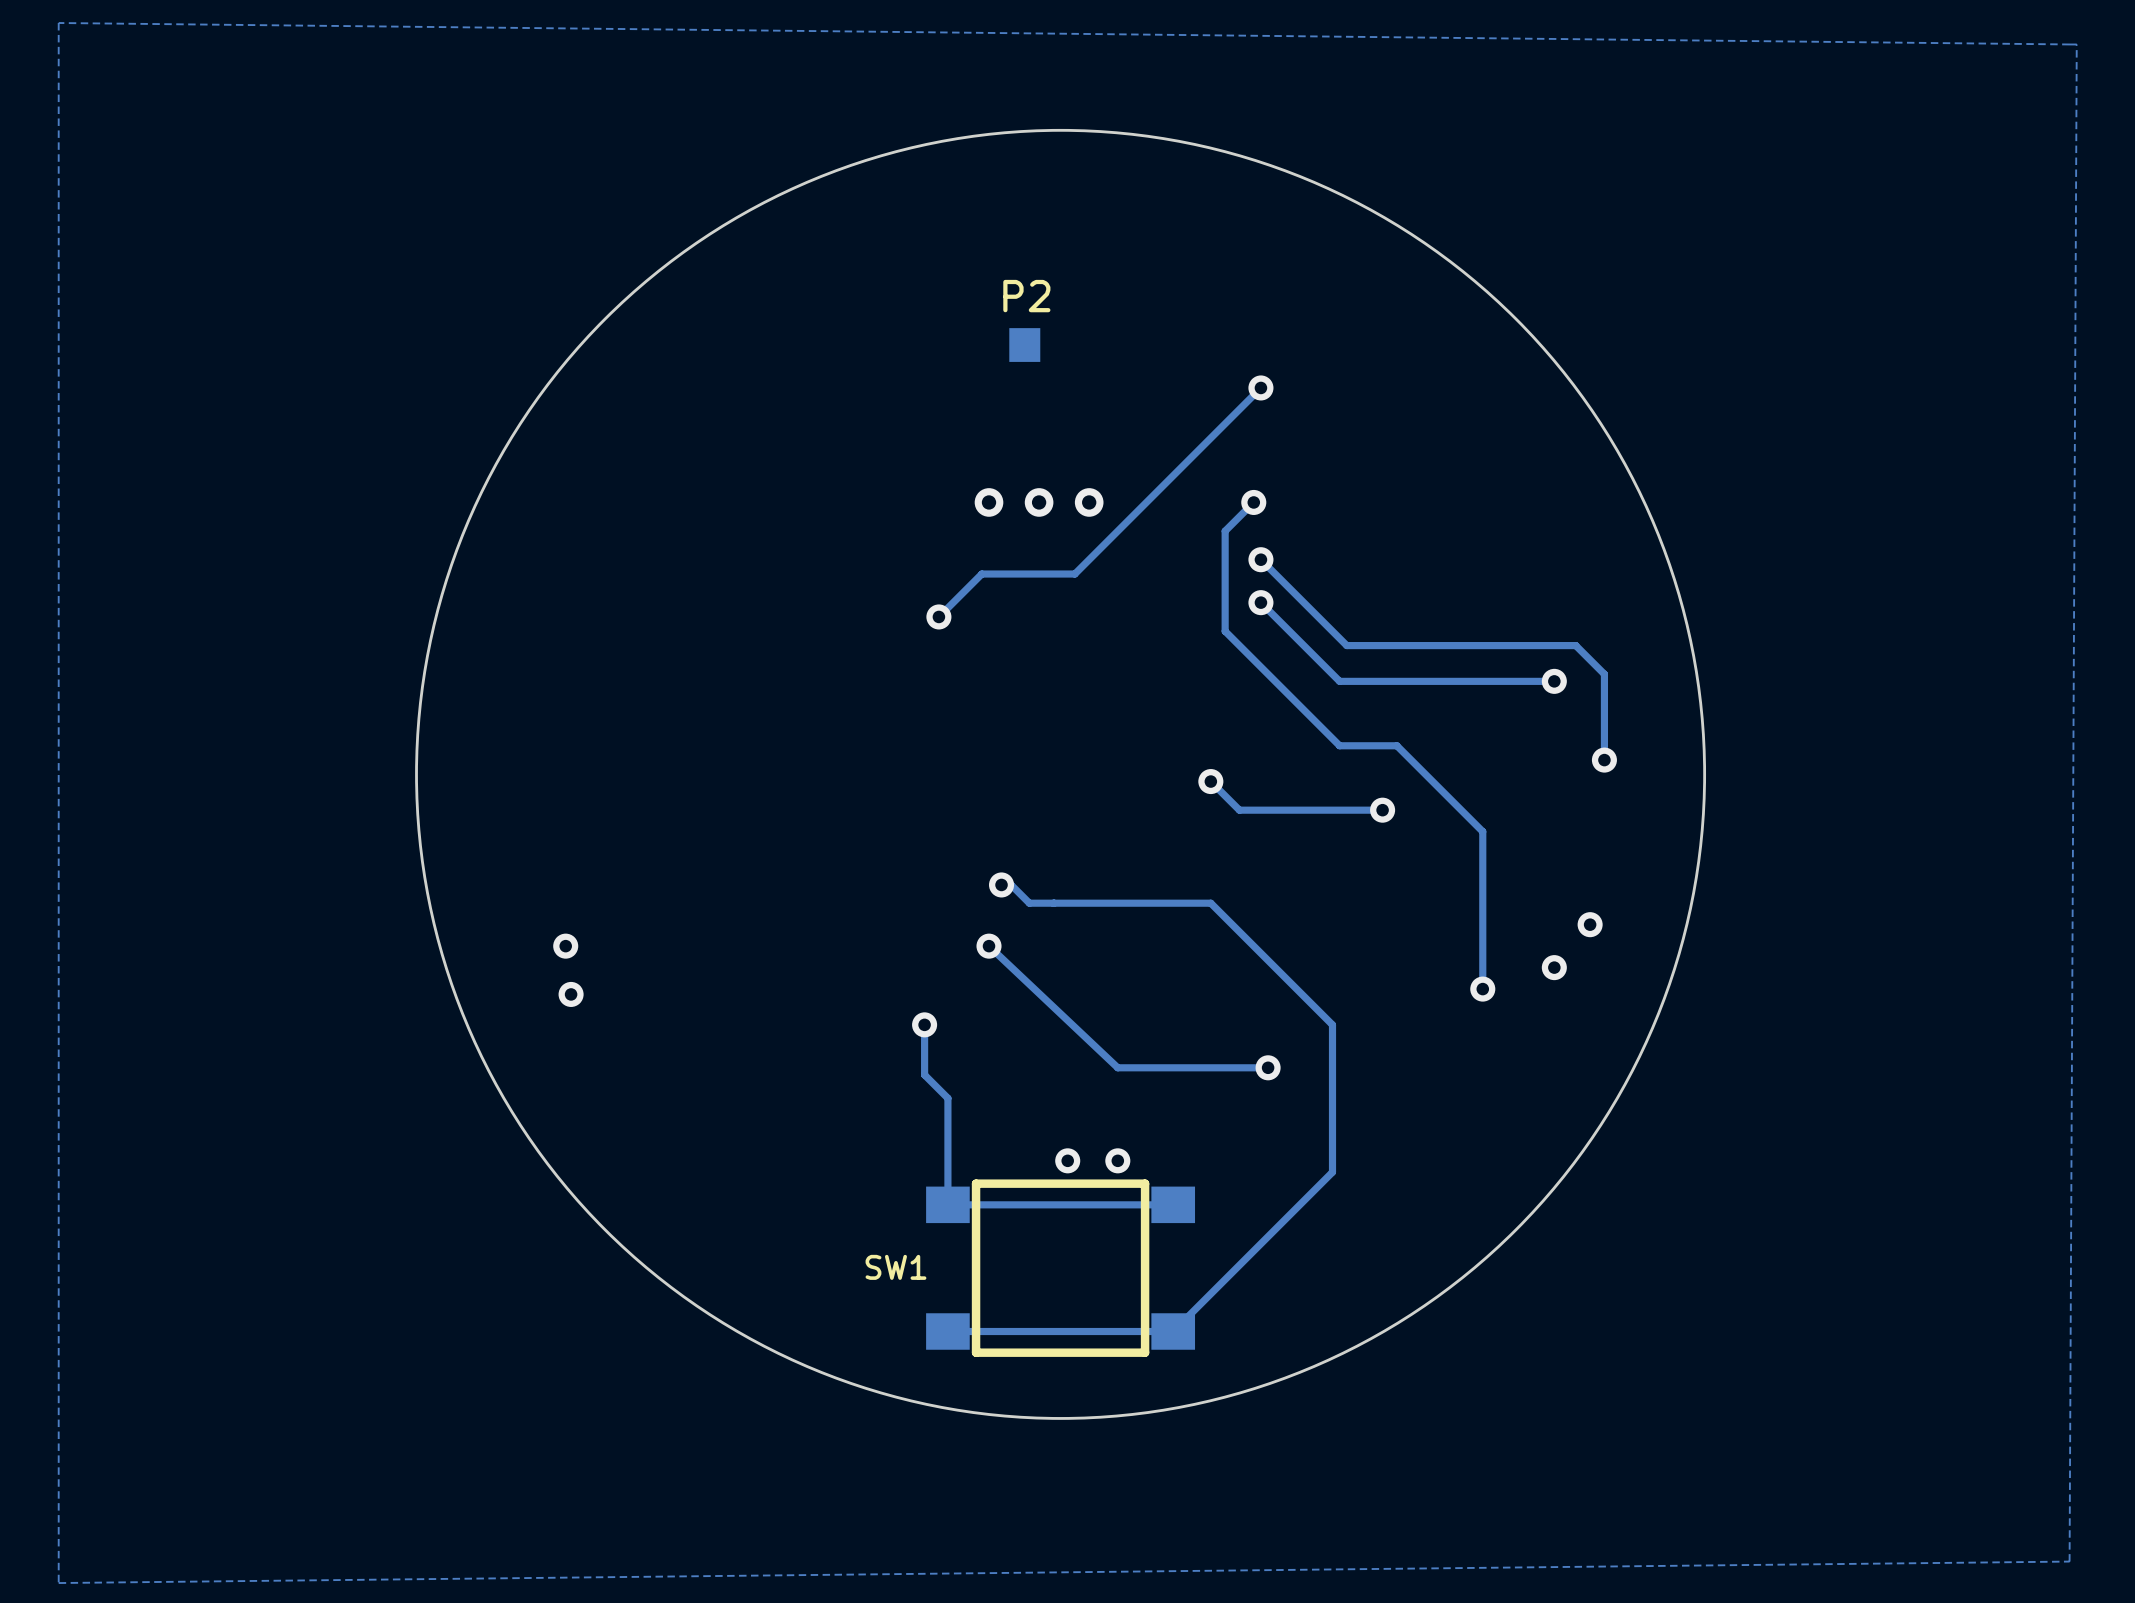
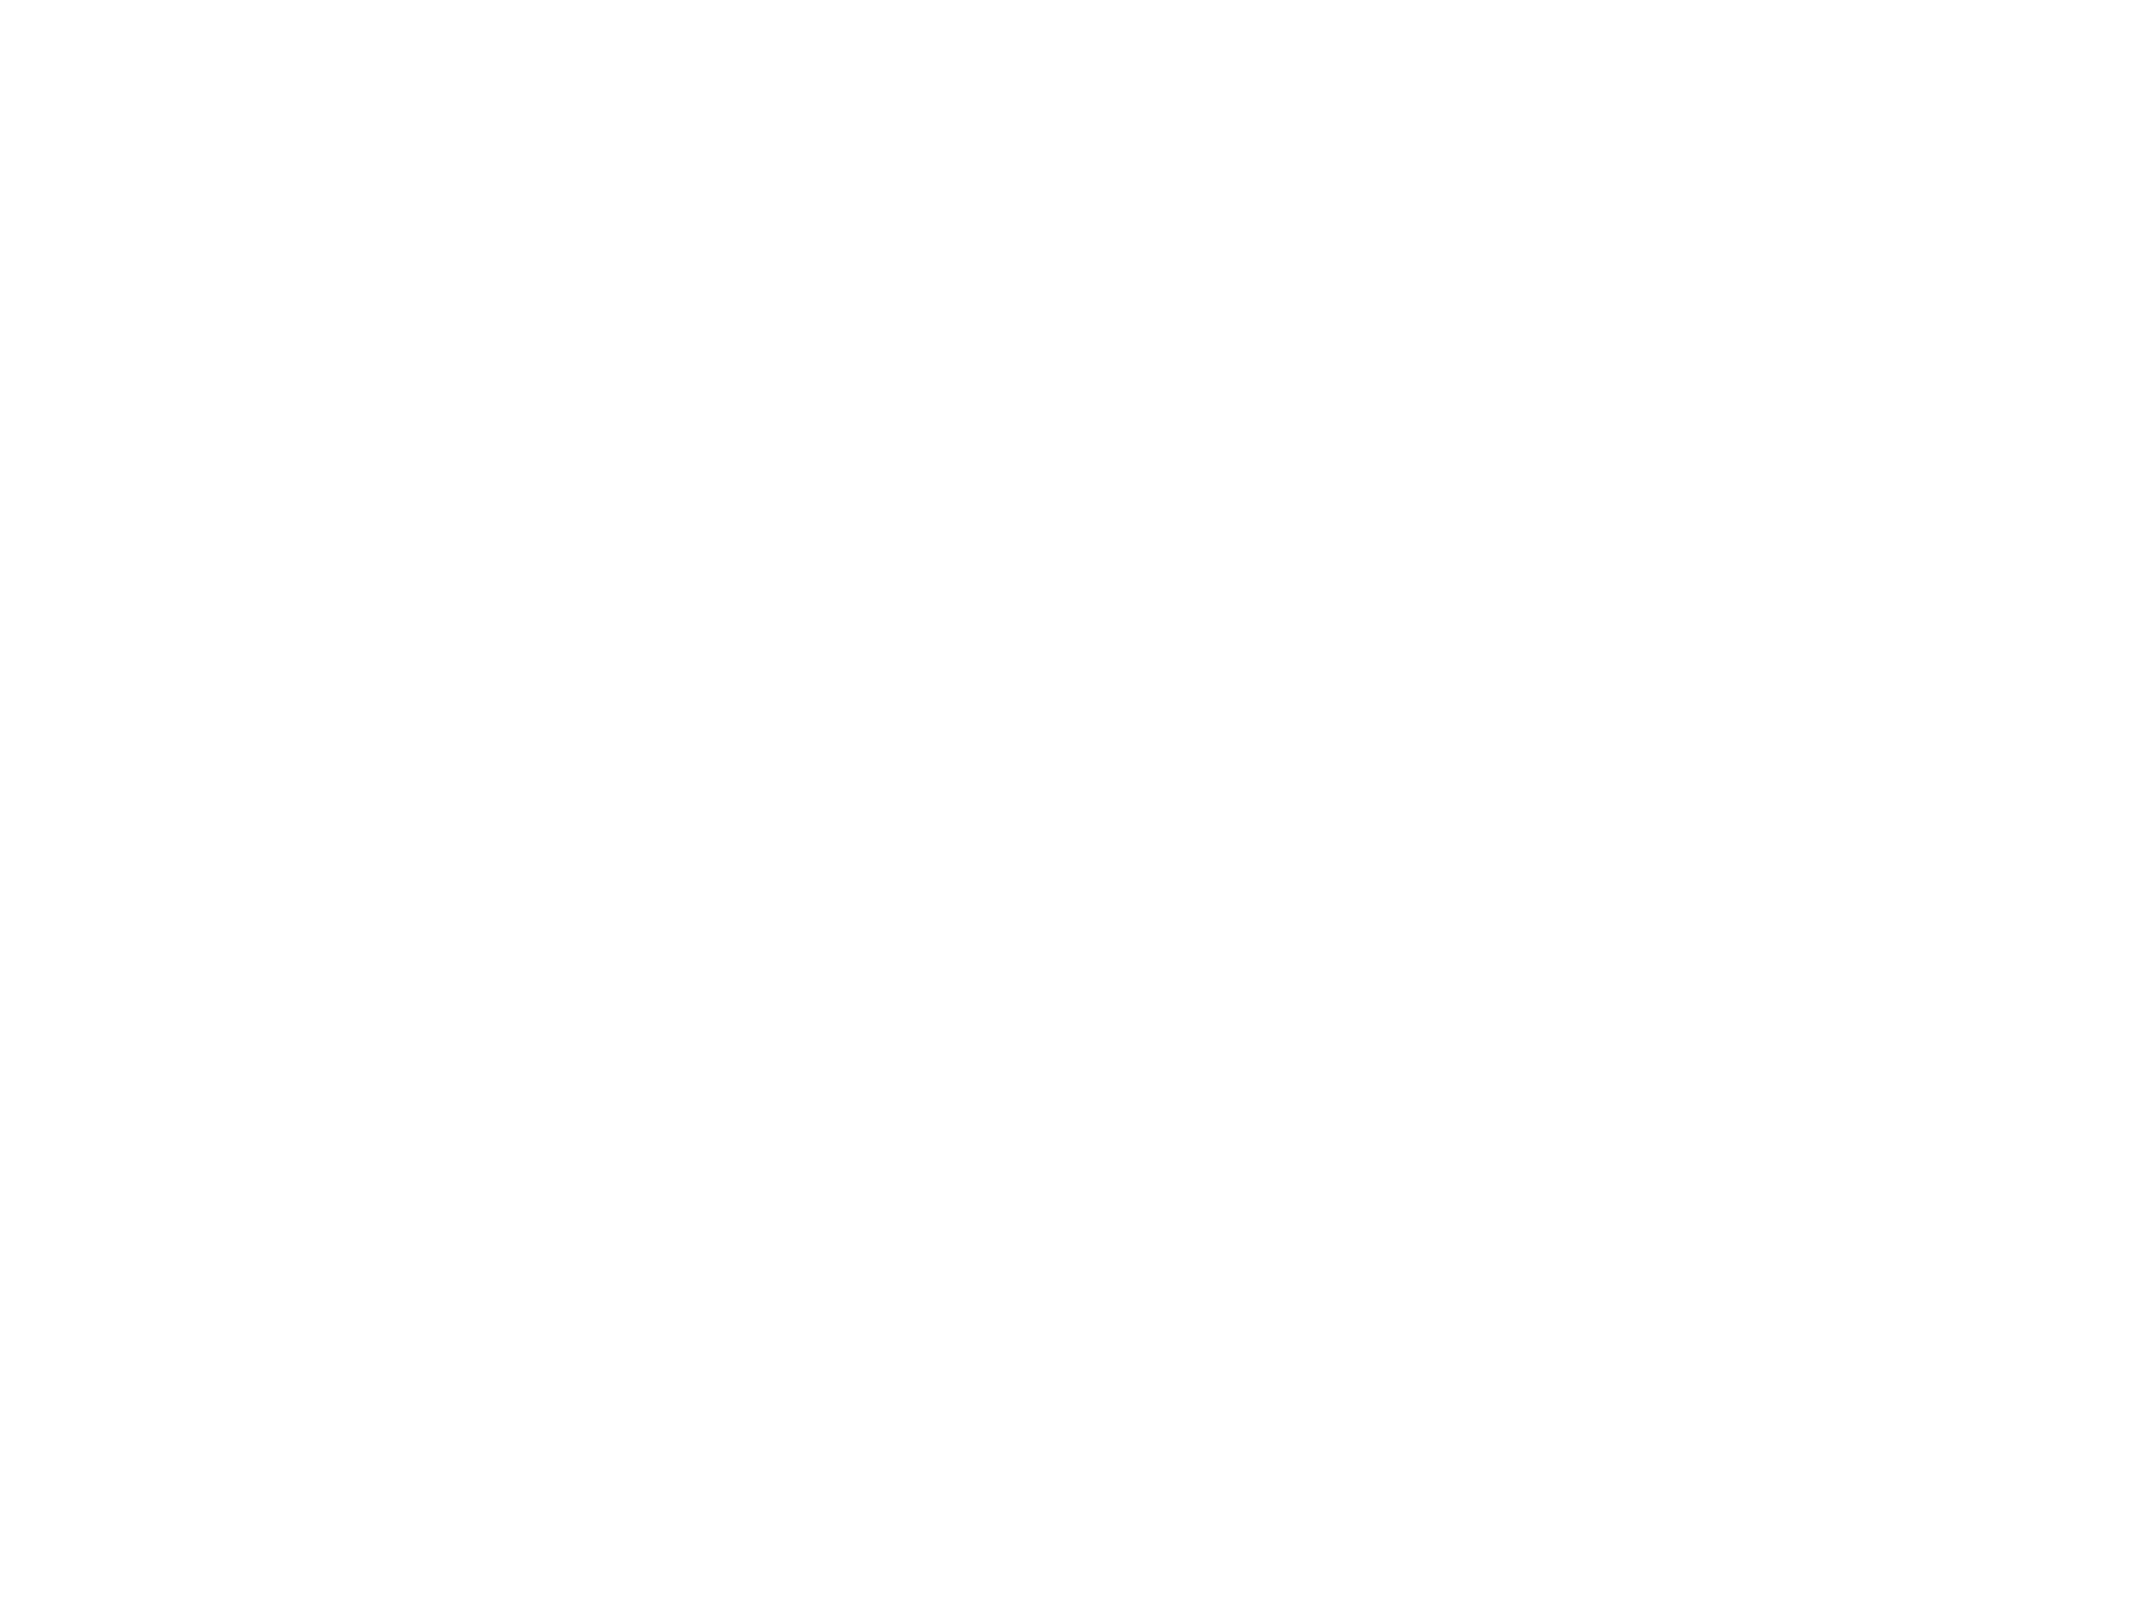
zone outline: (58, 22) (2076, 44) (2069, 1561) (58, 1583) (58, 22) -> none
round board edge: [415, 128, 1707, 1420] -> none
P2: (1024, 345) -> none
track: (1260, 387) (1074, 574) (981, 574) (938, 616) -> none
via: (1260, 387) -> none
via: (989, 502) -> none
via: (1039, 502) -> none
via: (1089, 502) -> none
track: (1253, 502) (1225, 531) (1225, 631) (1339, 745) (1396, 745) (1482, 831) (1482, 989) -> none
via: (1253, 502) -> none
track: (1260, 559) (1346, 645) (1575, 645) (1604, 674) (1604, 760) -> none
via: (1260, 559) -> none
track: (1260, 602) (1339, 681) (1554, 681) -> none
via: (1260, 602) -> none
via: (938, 616) -> none
via: (1554, 681) -> none
via: (1604, 760) -> none
track: (1210, 781) (1239, 810) (1382, 810) -> none
via: (1210, 781) -> none
via: (1382, 810) -> none
track: (1001, 884) (1011, 884) (1029, 903) (1210, 903) (1332, 1024) (1332, 1172) (1173, 1331) (947, 1331) -> none
via: (1001, 884) -> none
via: (1590, 924) -> none
via: (565, 946) -> none
track: (989, 946) (1117, 1067) (1268, 1067) -> none
via: (989, 946) -> none
via: (1554, 967) -> none
via: (1482, 989) -> none
via: (571, 994) -> none
track: (924, 1024) (924, 1074) (947, 1098) (947, 1204) (1173, 1204) -> none
via: (924, 1024) -> none
via: (1268, 1067) -> none
via: (1067, 1160) -> none
via: (1117, 1160) -> none
SW1: (1060, 1268) -> none

